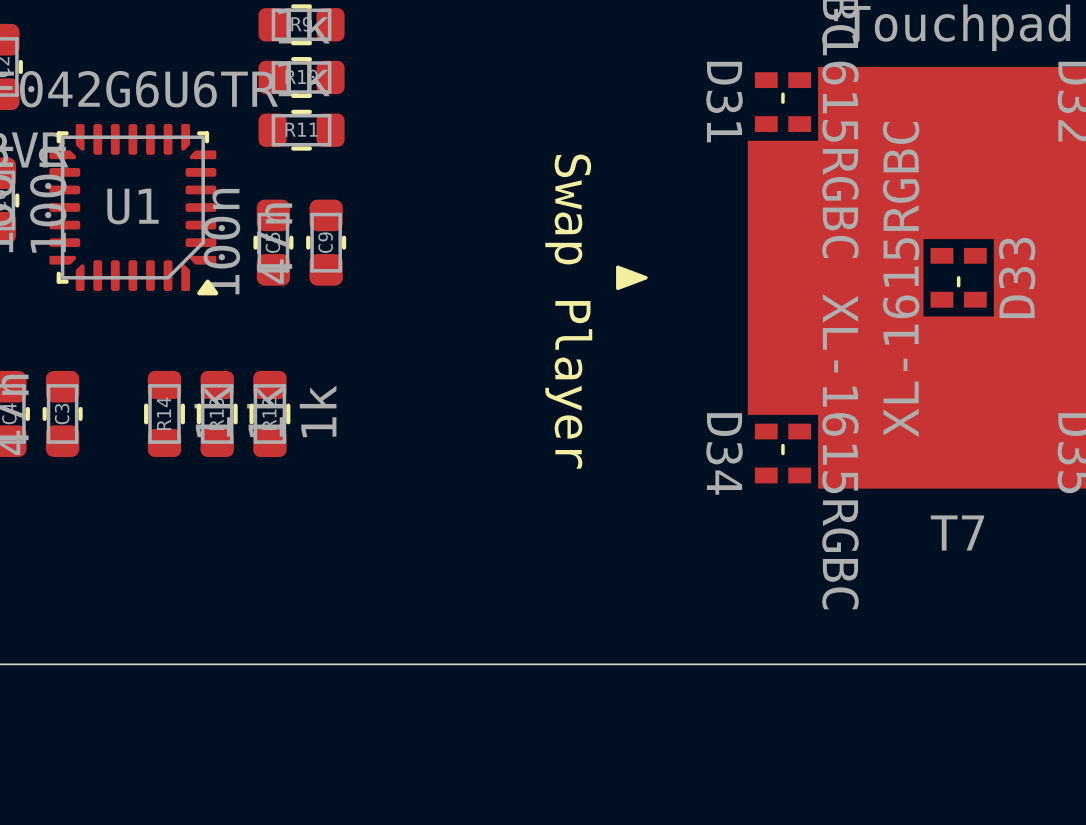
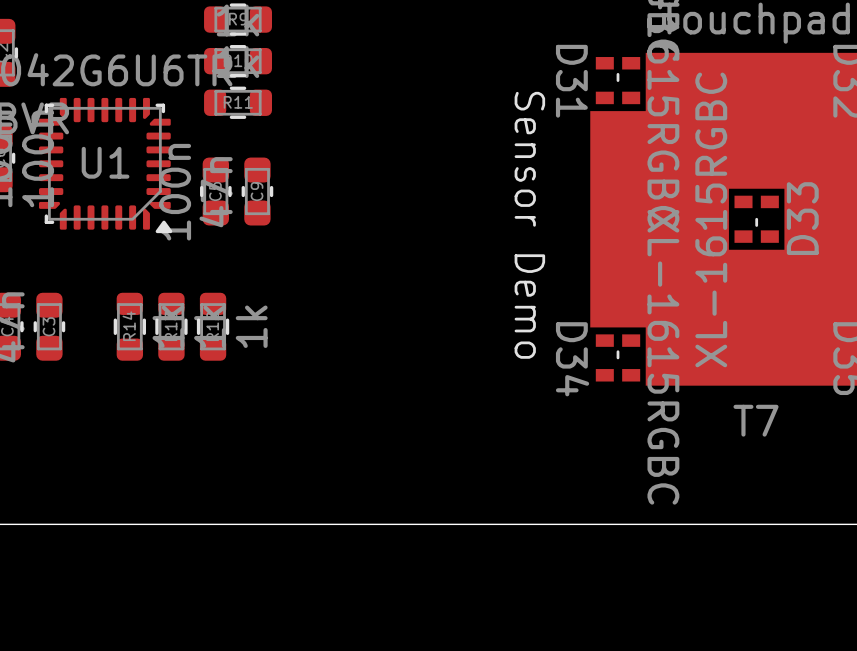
drawing: [616, 265, 648, 291] -> none
text: none -> Sensor Demo (529, 225)
text: Swap Player (568, 311) -> none

